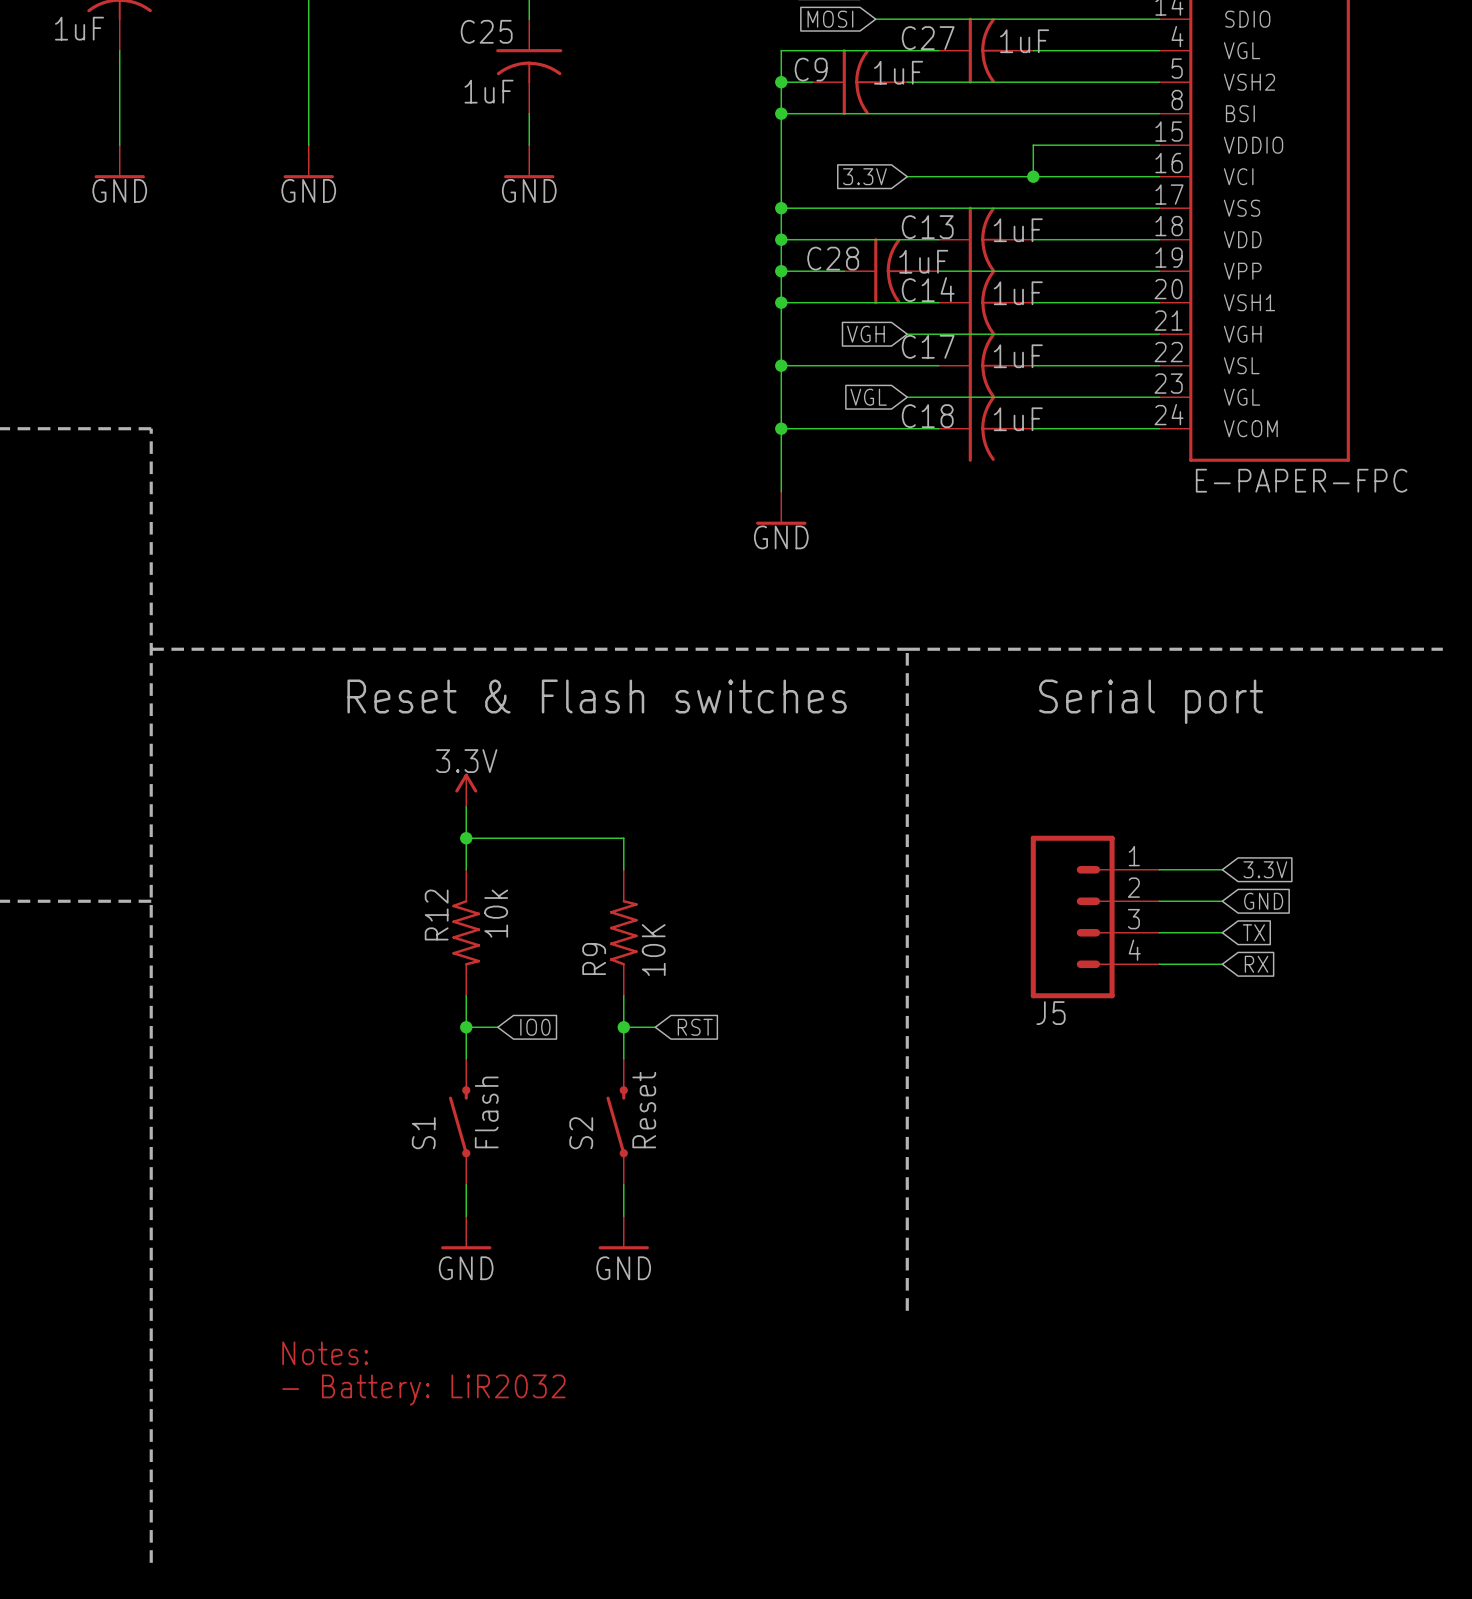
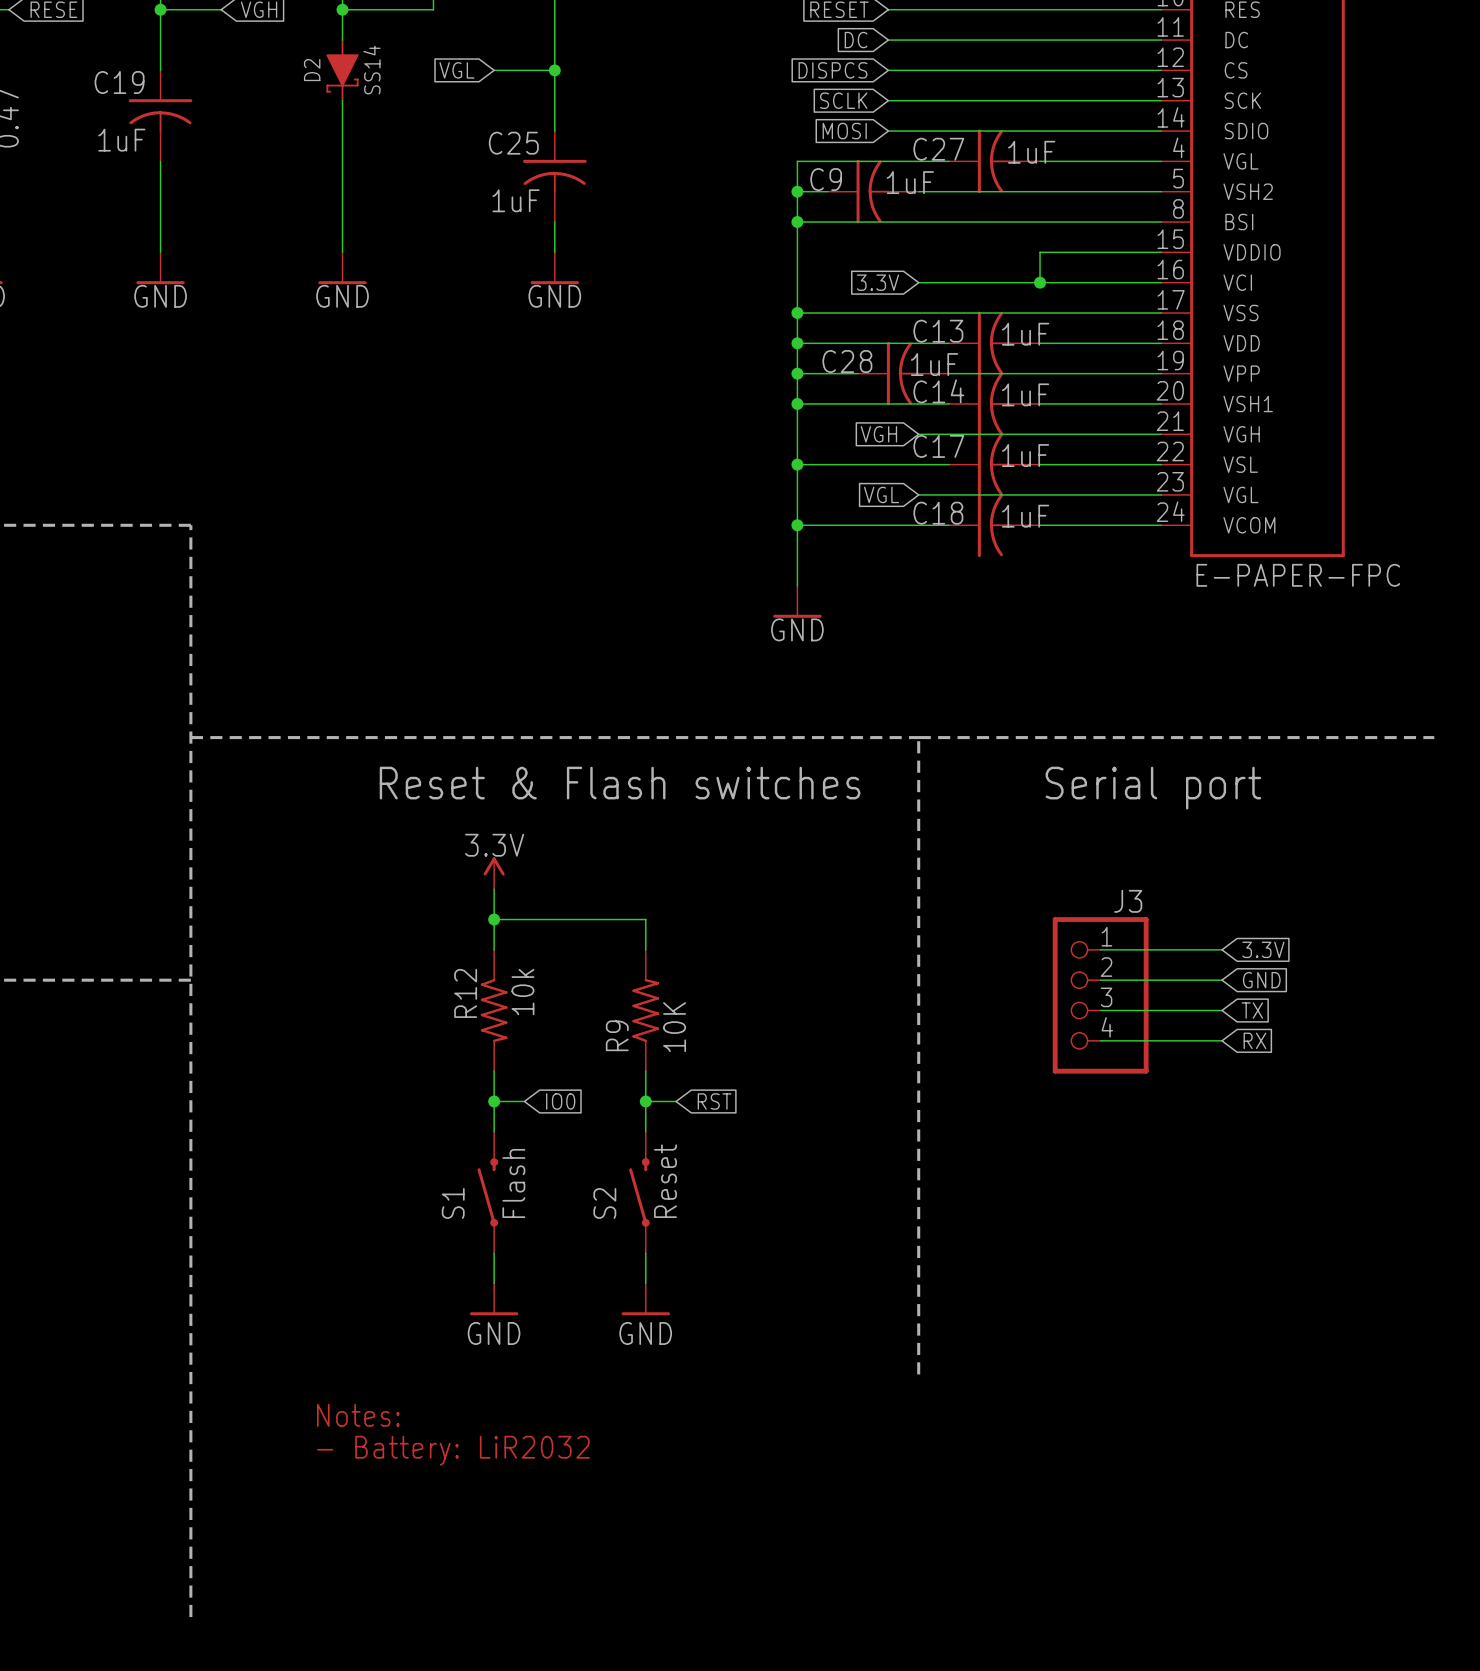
J5: (1095, 917) -> none
J3: none -> (1100, 995)

